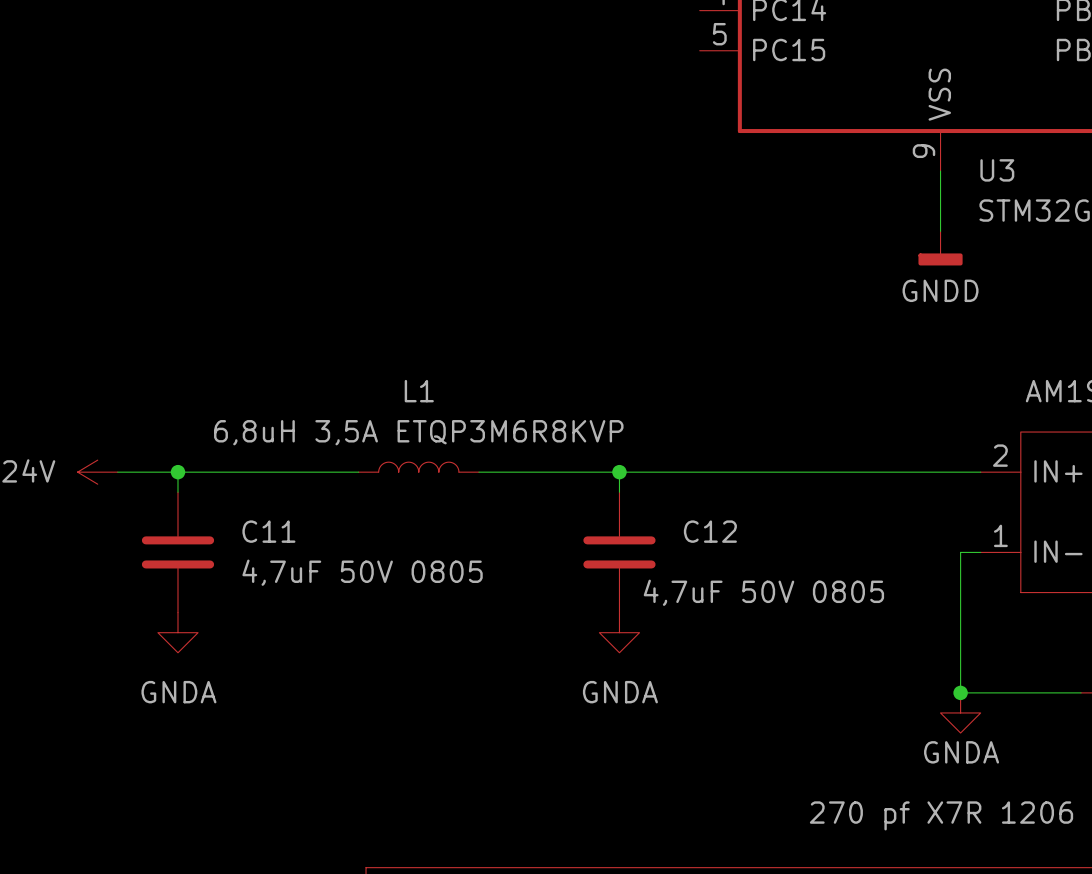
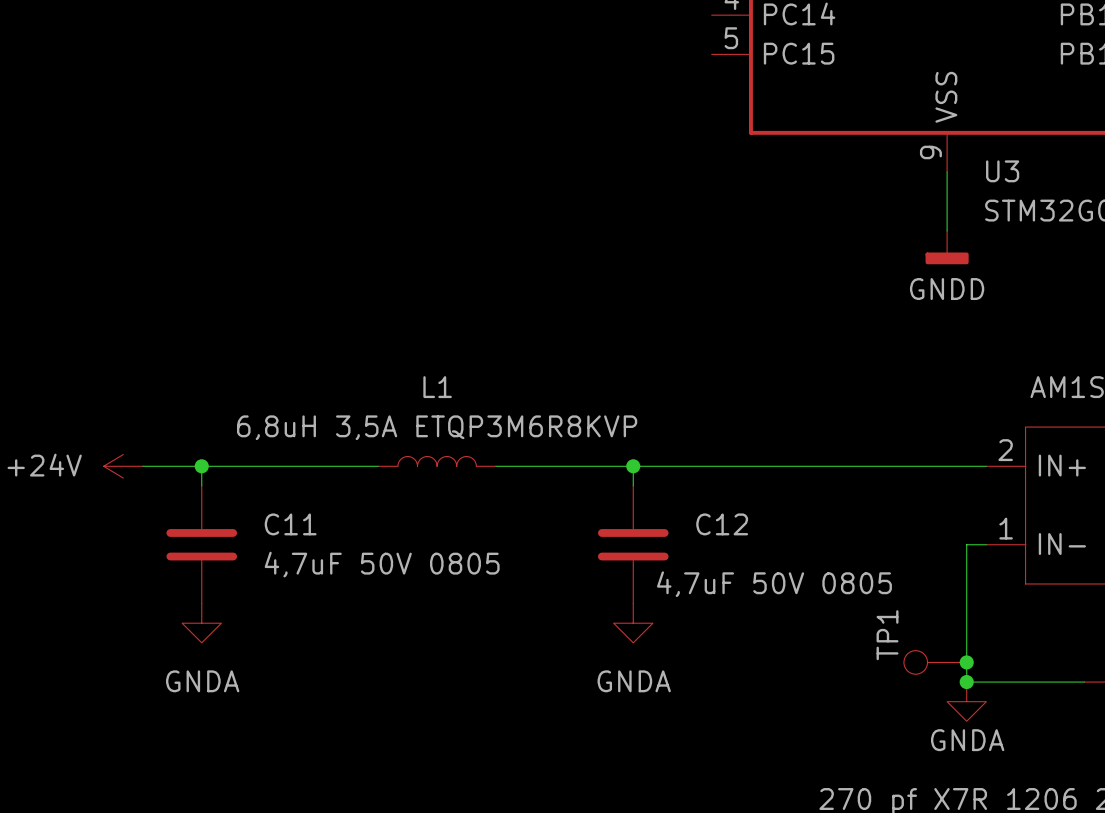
TP1: none -> (935, 662)
junction: none -> (966, 662)

